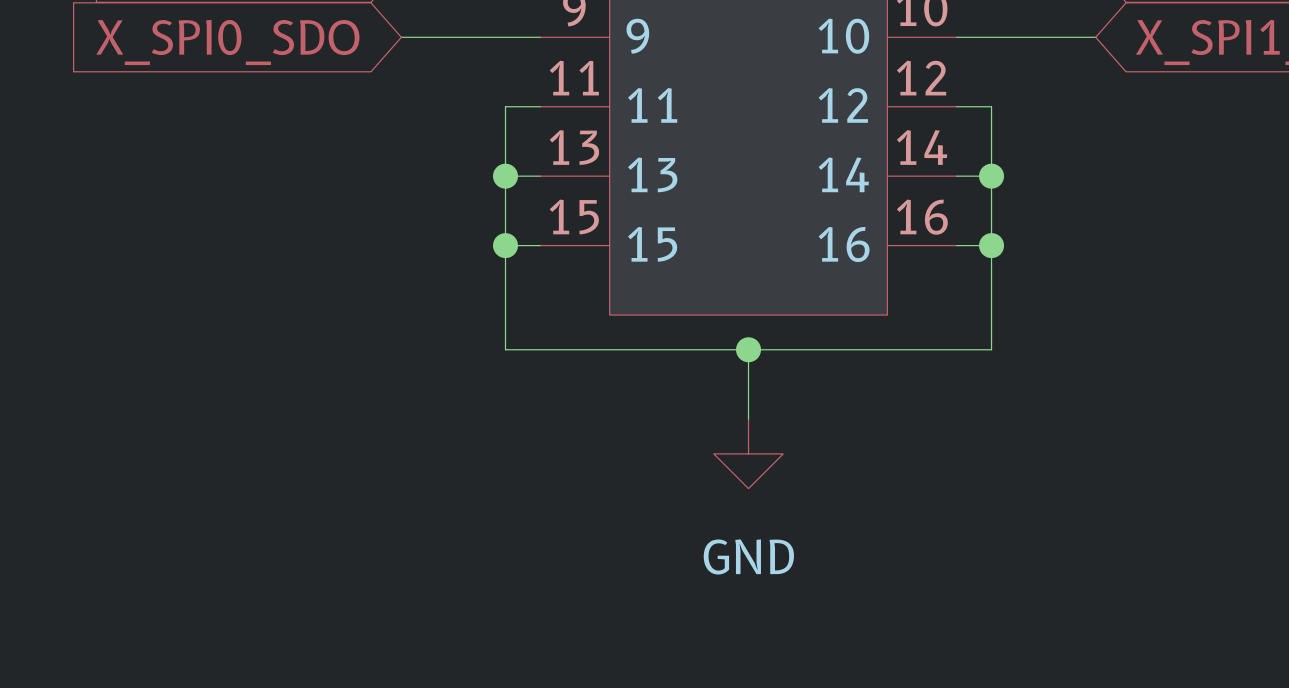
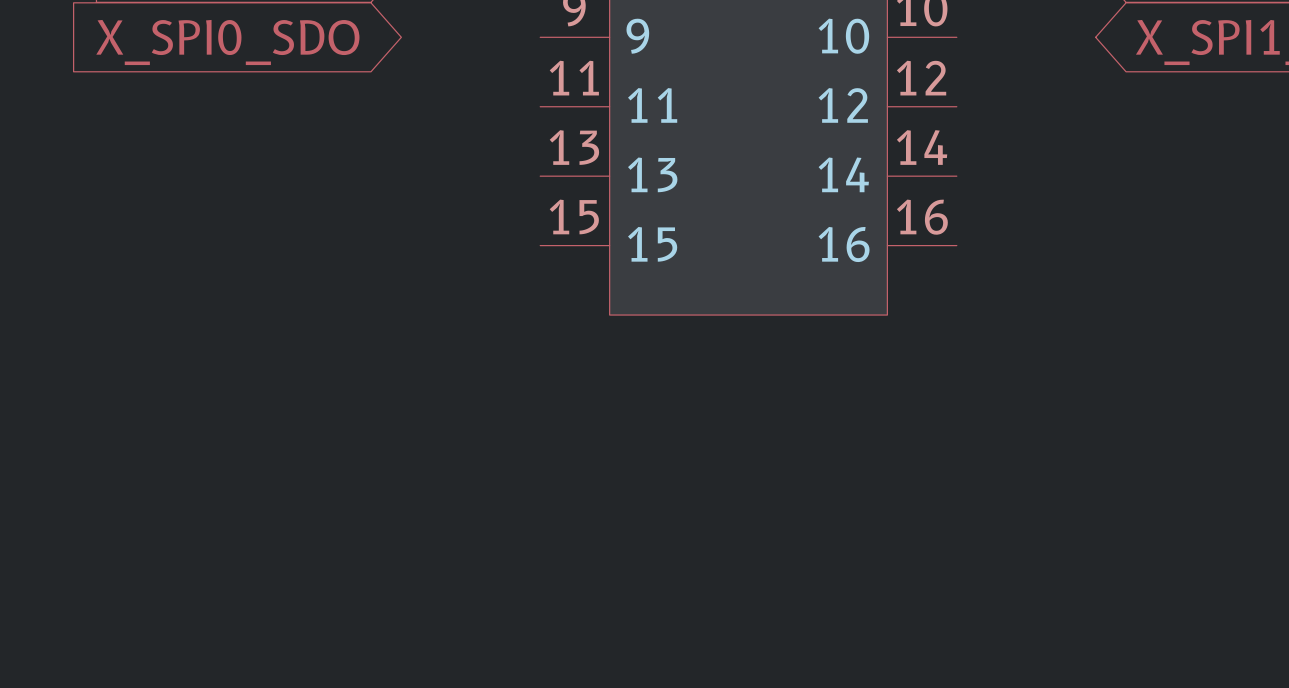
wire: (401, 37) (540, 37) -> none
wire: (956, 37) (1095, 37) -> none
wire: (540, 106) (505, 106) (505, 349) (991, 349) (991, 106) (956, 106) -> none
wire: (505, 176) (540, 176) -> none
junction: (505, 176) -> none
wire: (956, 176) (991, 176) -> none
junction: (991, 176) -> none
wire: (505, 245) (540, 245) -> none
junction: (505, 245) -> none
wire: (956, 245) (991, 245) -> none
junction: (991, 245) -> none
wire: (748, 349) (748, 419) -> none
junction: (748, 349) -> none
power symbol: GND (748, 453) -> none

